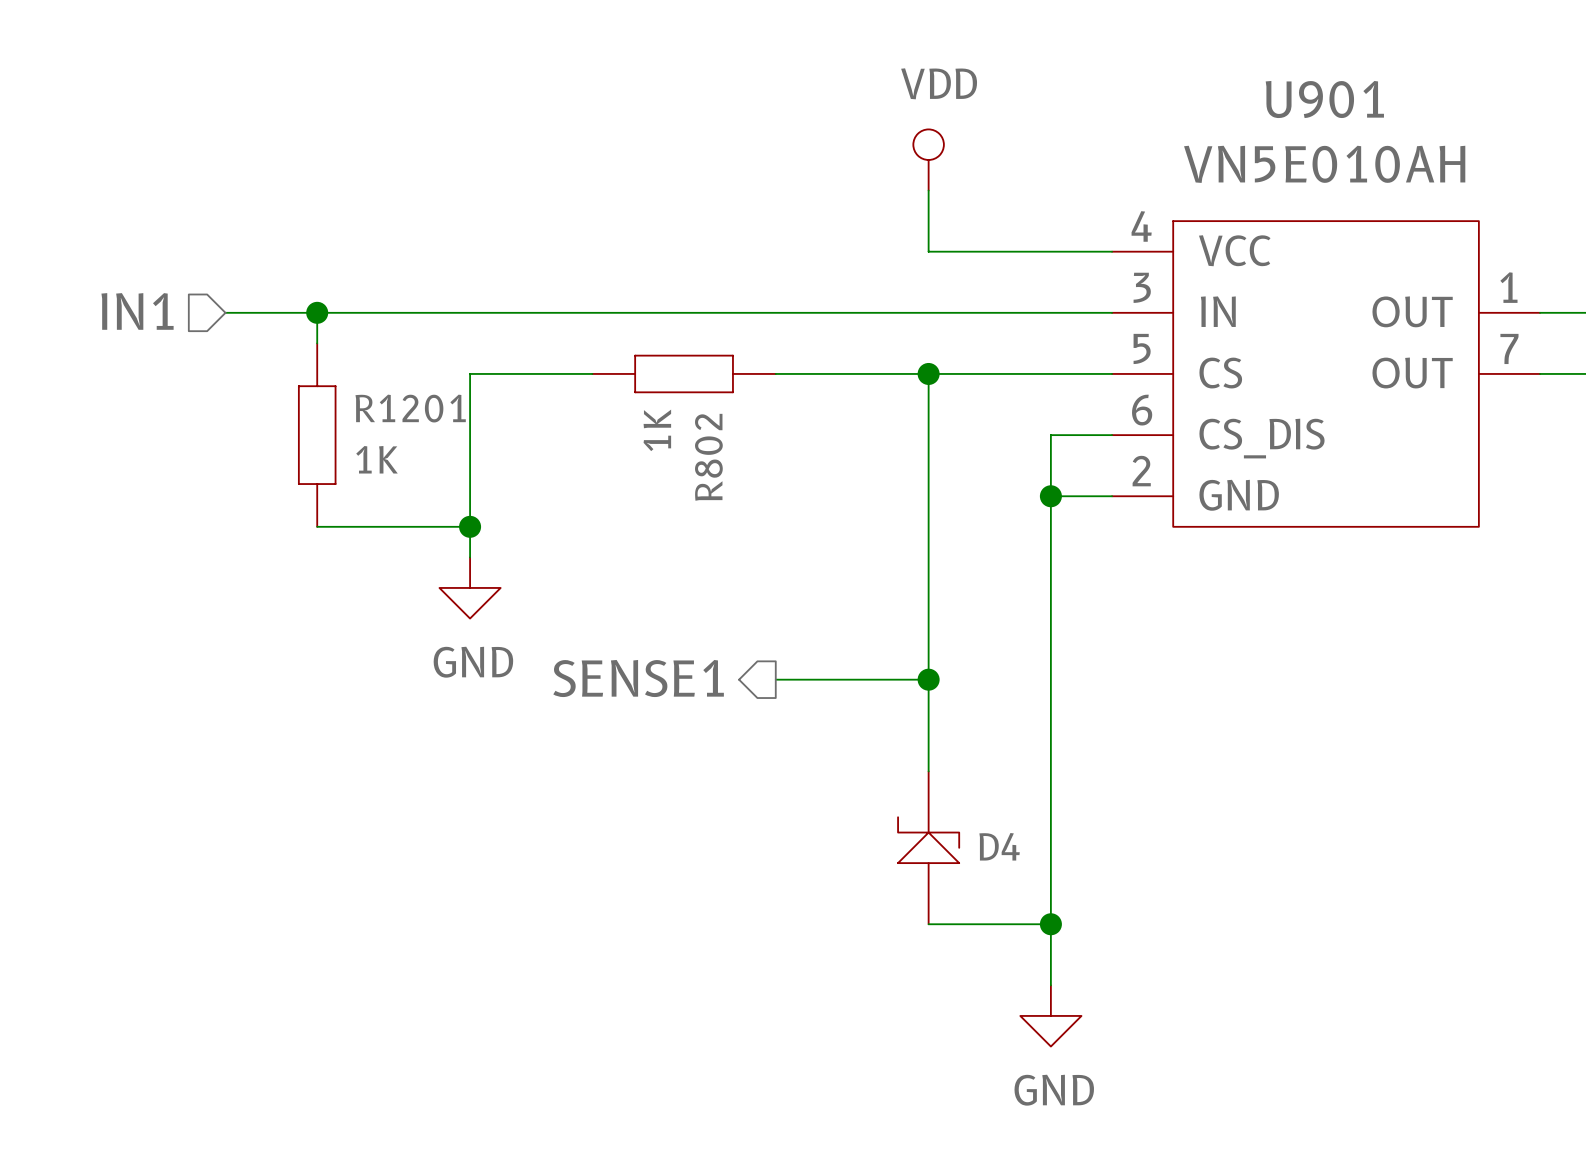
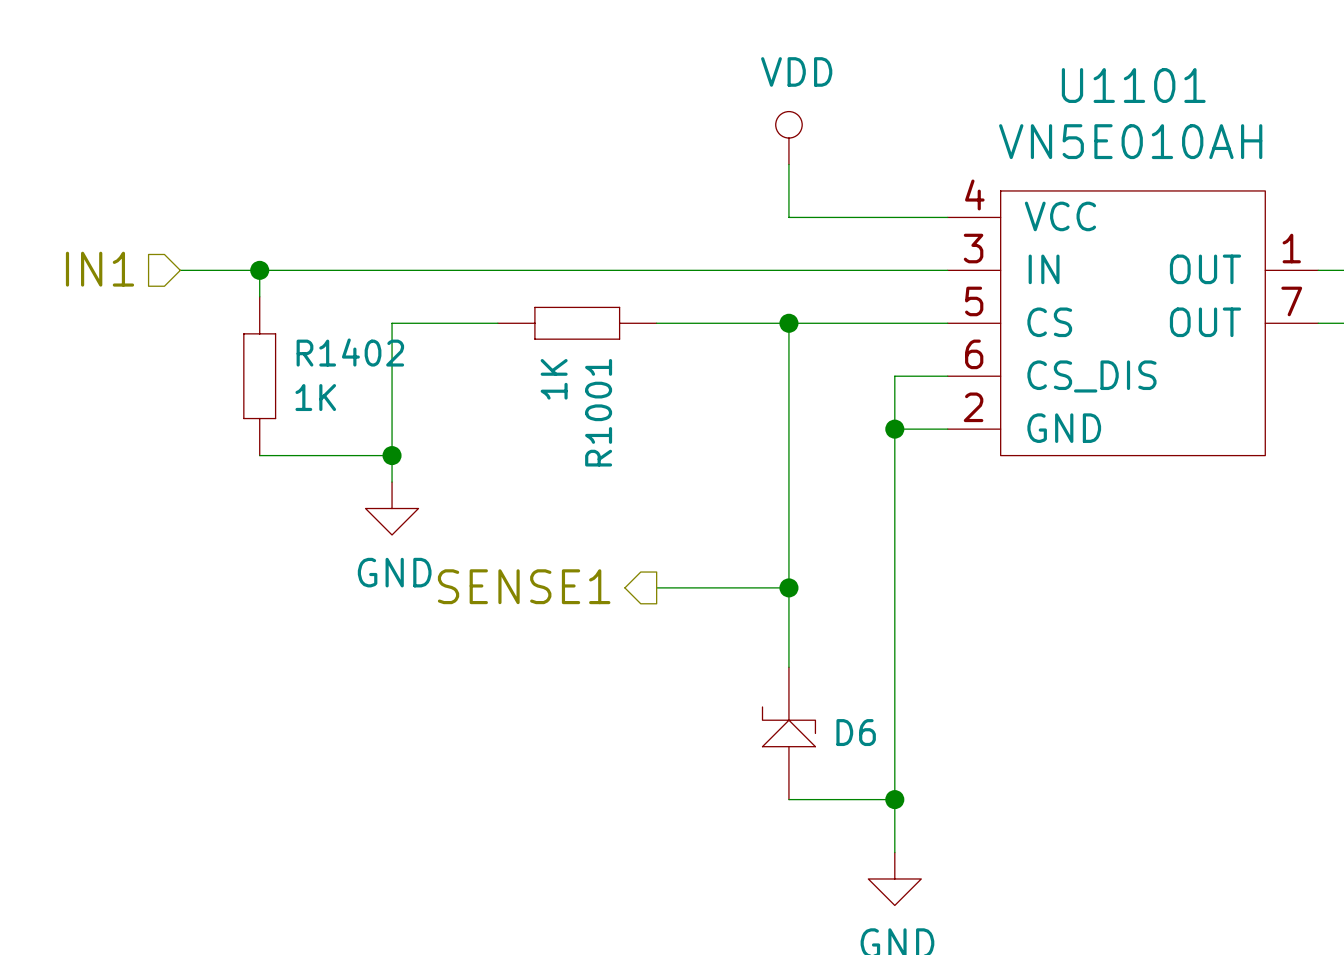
U901 name: U901 (1324, 99) -> U1101 (1133, 85)
R1201 name: R1201 (410, 408) -> R1402 (350, 352)
R802 name: R802 (708, 457) -> R1001 (598, 412)
D4 name: D4 (999, 846) -> D6 (856, 732)

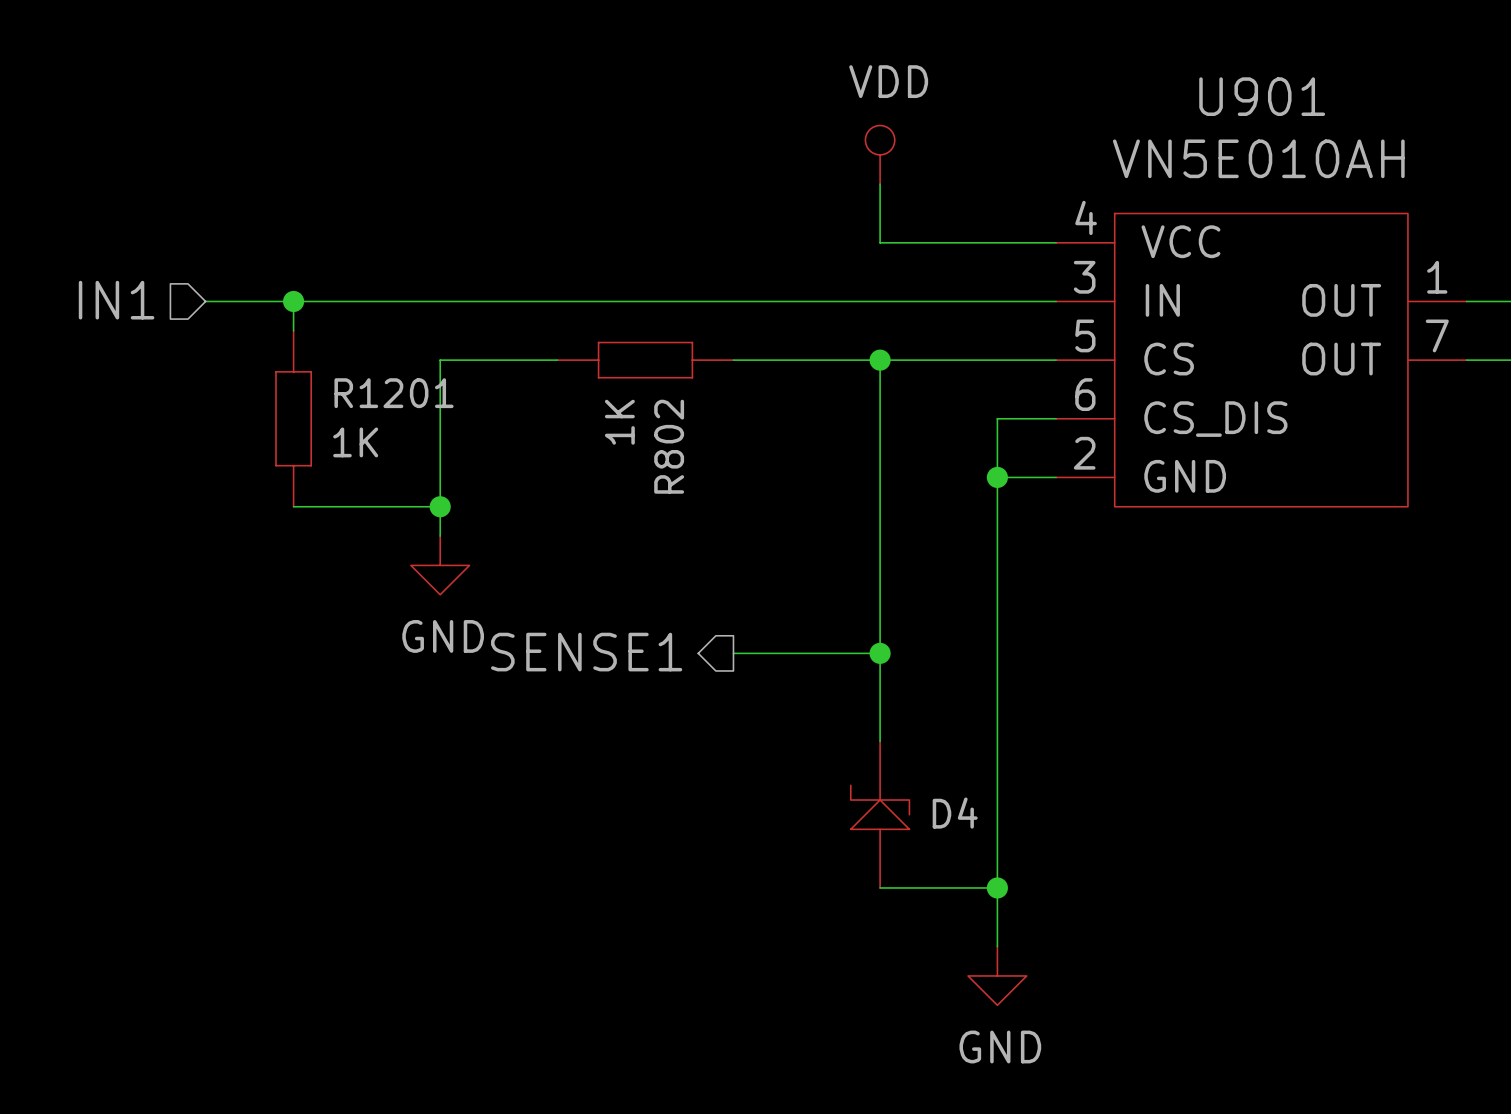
U1101 name: U1101 (1133, 85) -> U901 (1262, 96)
R1402 name: R1402 (350, 352) -> R1201 (394, 393)
R1001 name: R1001 (598, 412) -> R802 (669, 446)
D6 name: D6 (856, 732) -> D4 (955, 813)

